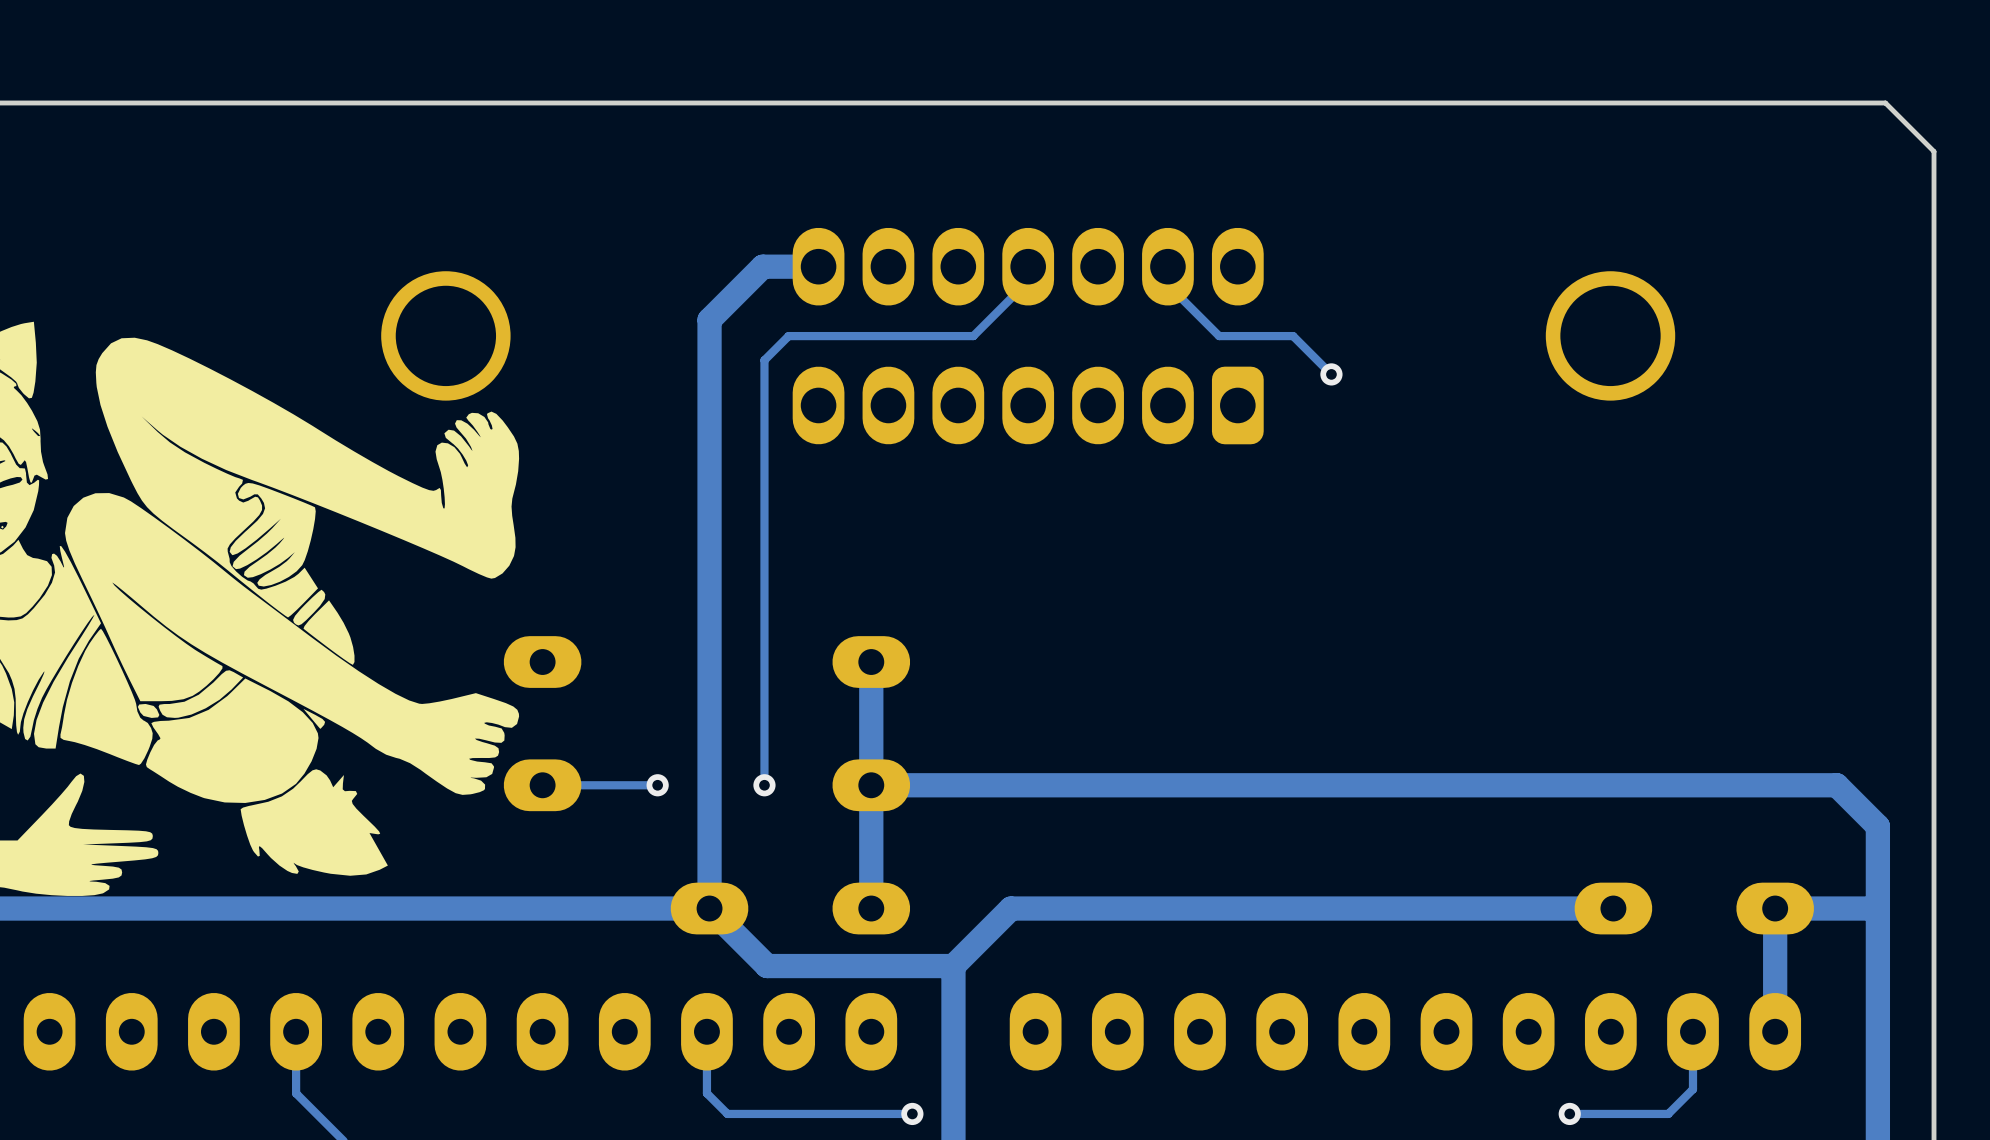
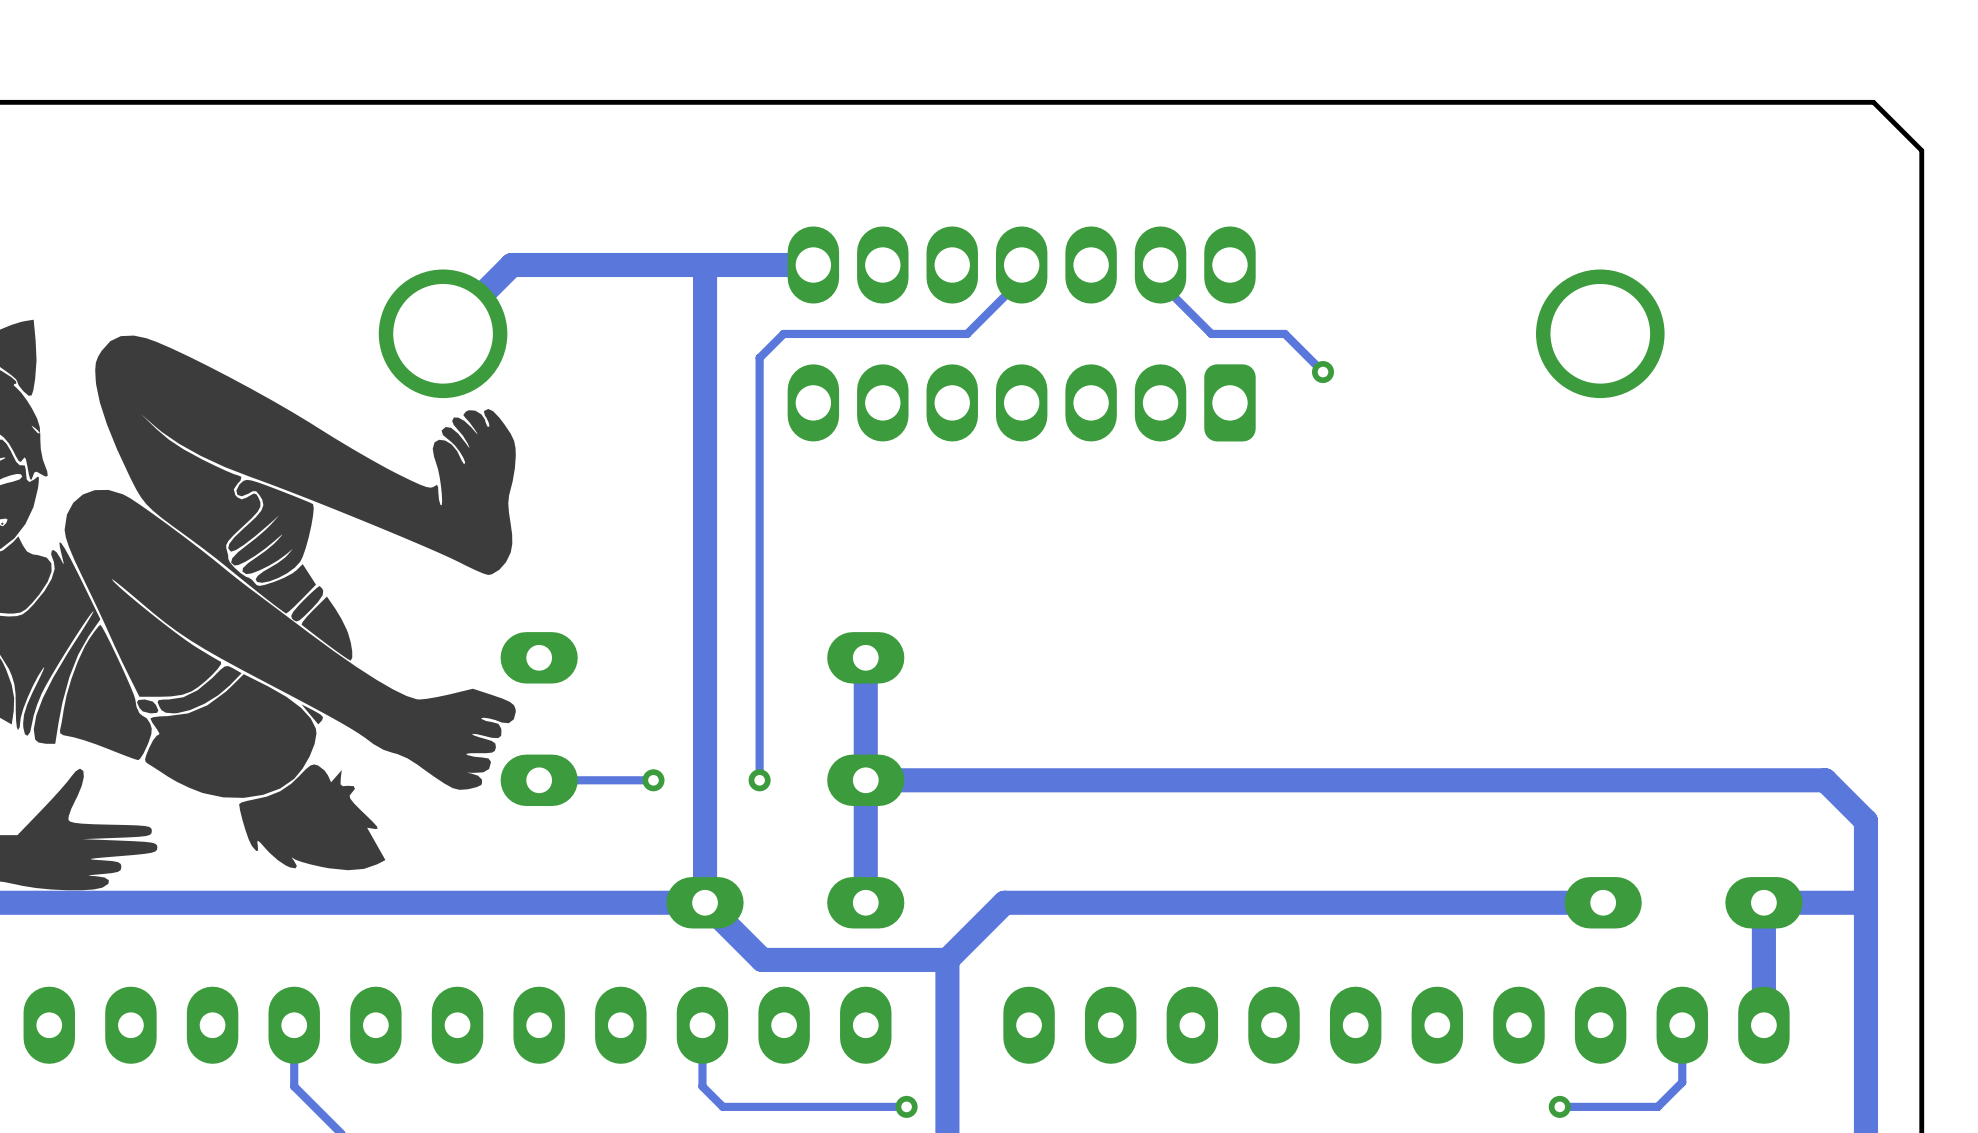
track: (762, 266) (709, 319) -> (714, 265) (705, 274) (705, 317)
track: none -> (757, 265) (511, 265) (443, 333)

